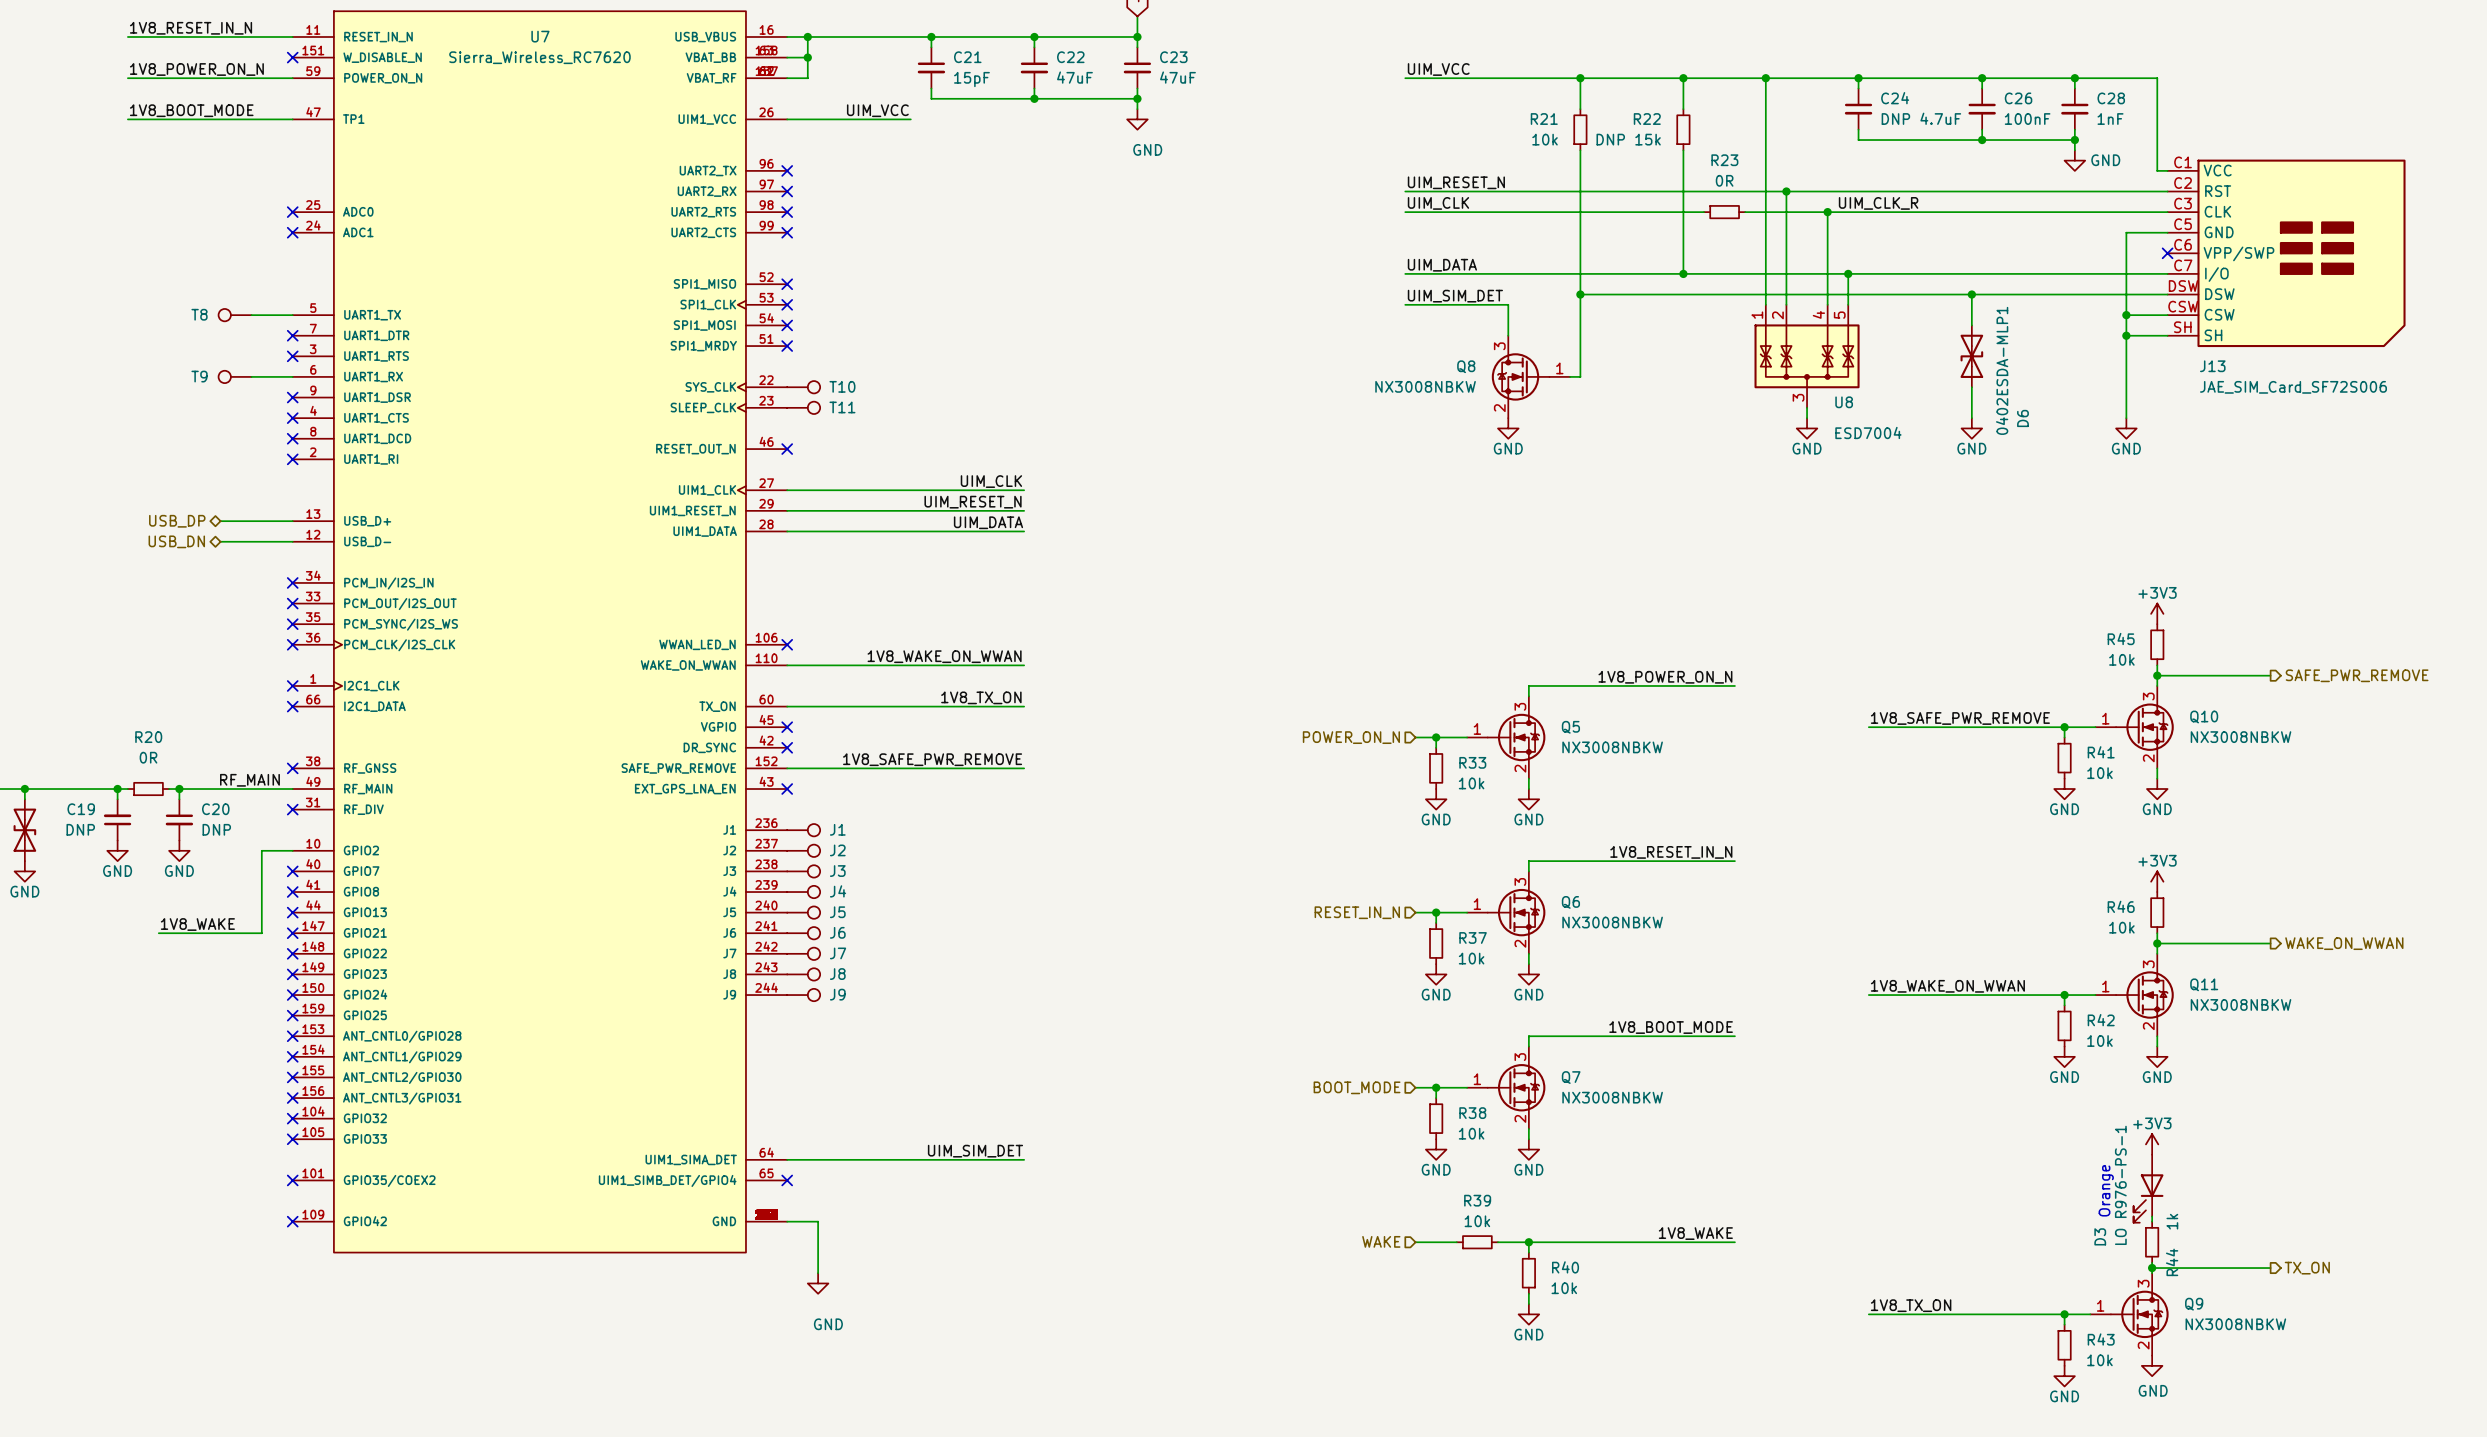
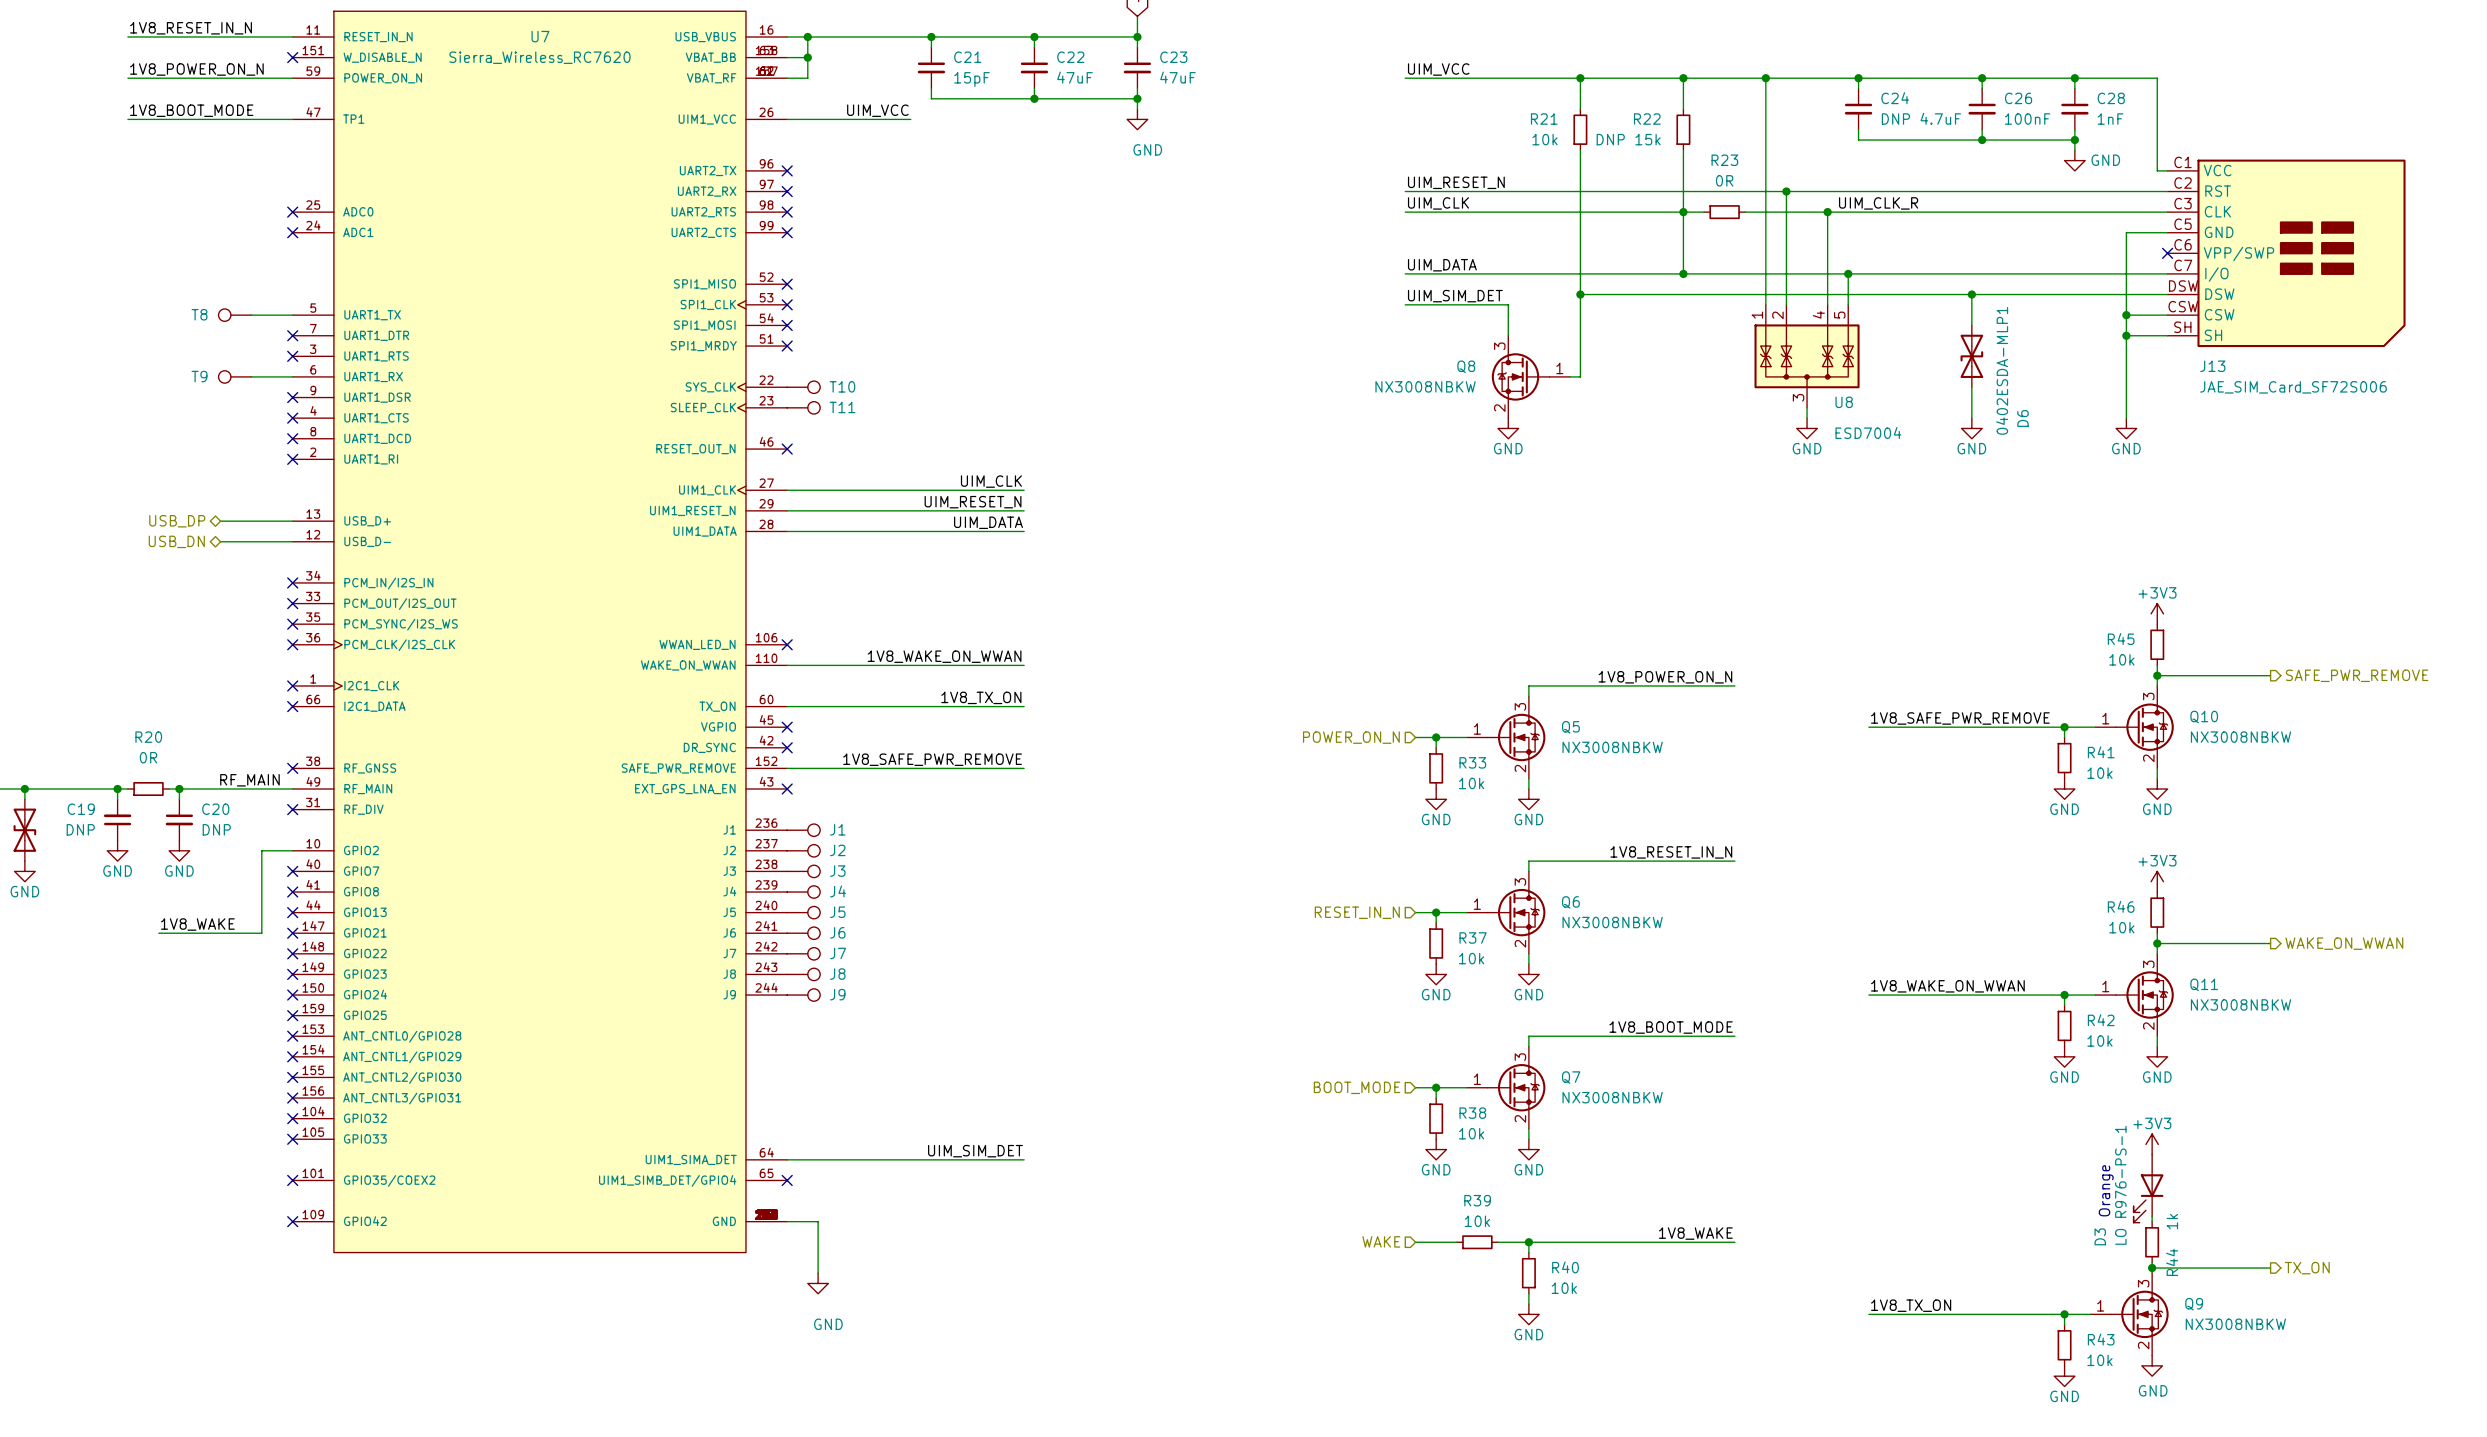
junction: none -> (1683, 212)

